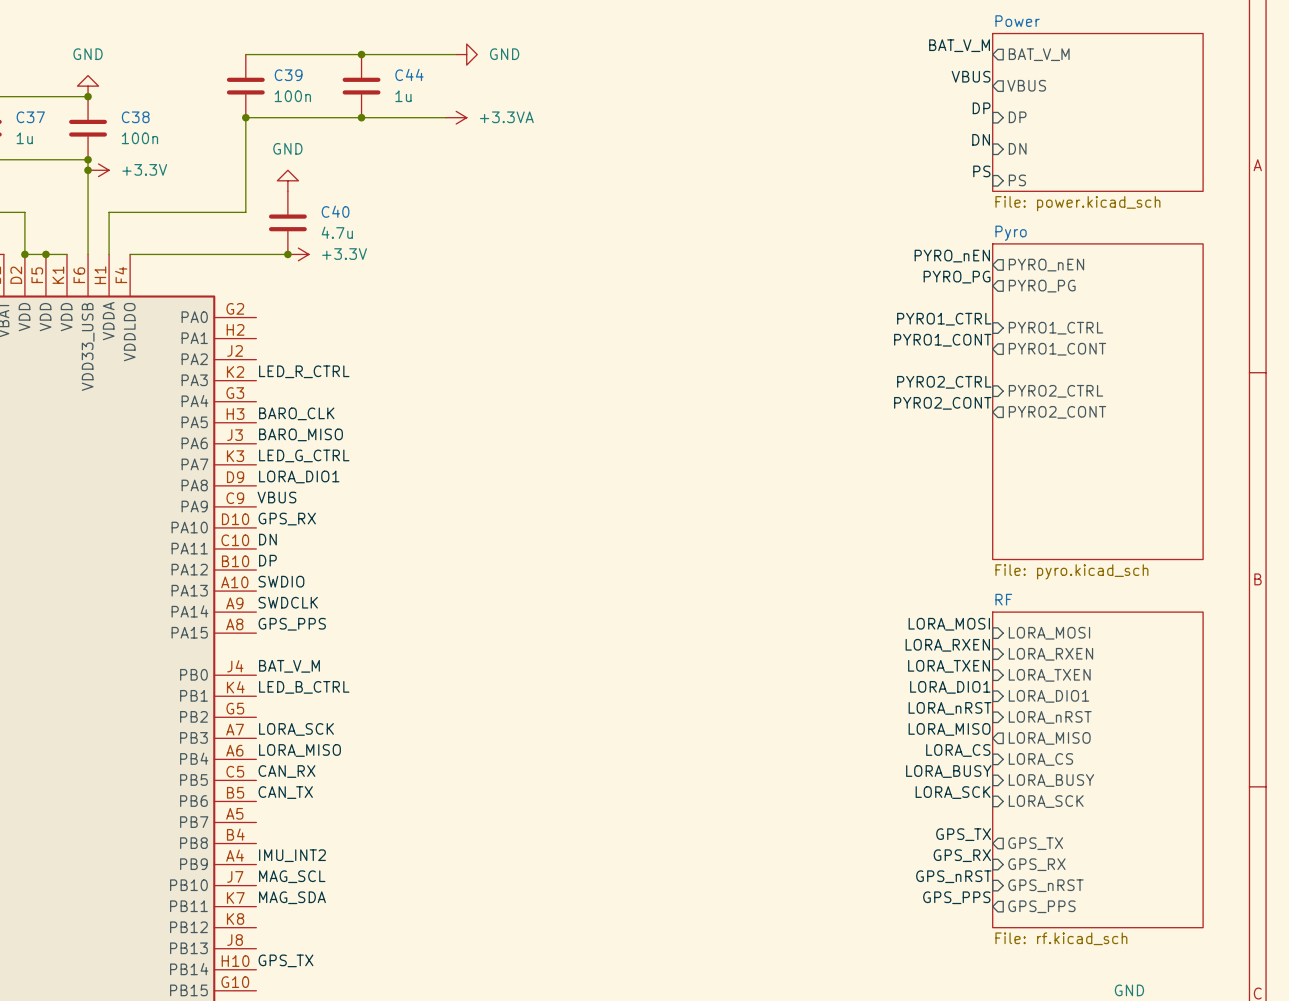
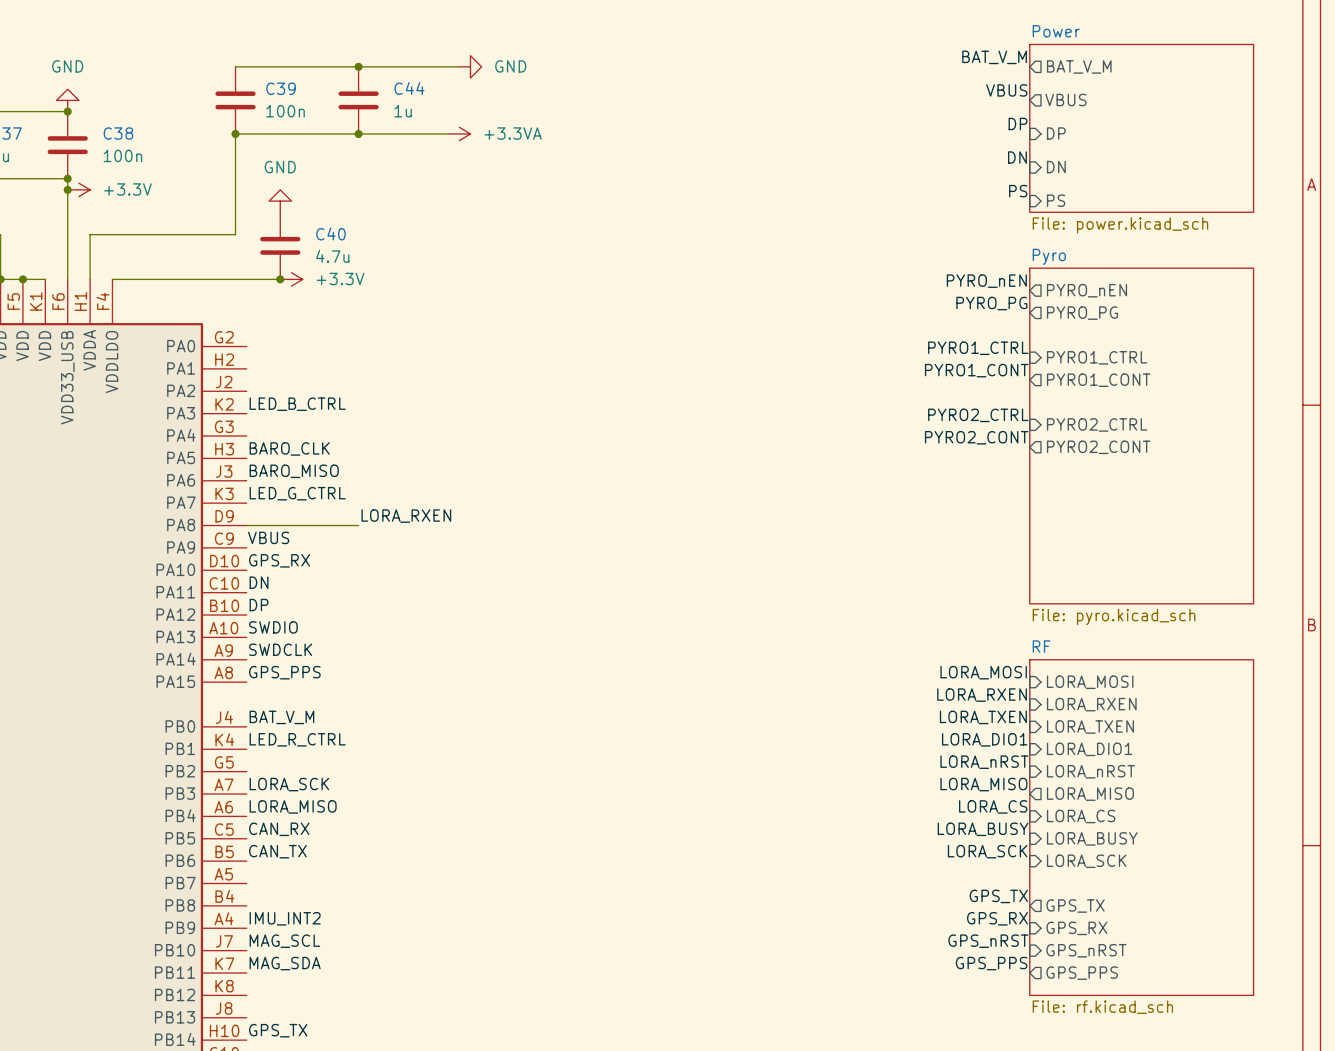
label: LED_R_CTRL (304, 371) -> LED_B_CTRL (297, 404)
label: LORA_DIO1 (299, 476) -> none
label: none -> LORA_RXEN (406, 516)
wire: none -> (246, 525) (358, 525)
label: LED_B_CTRL (304, 687) -> LED_R_CTRL (297, 739)

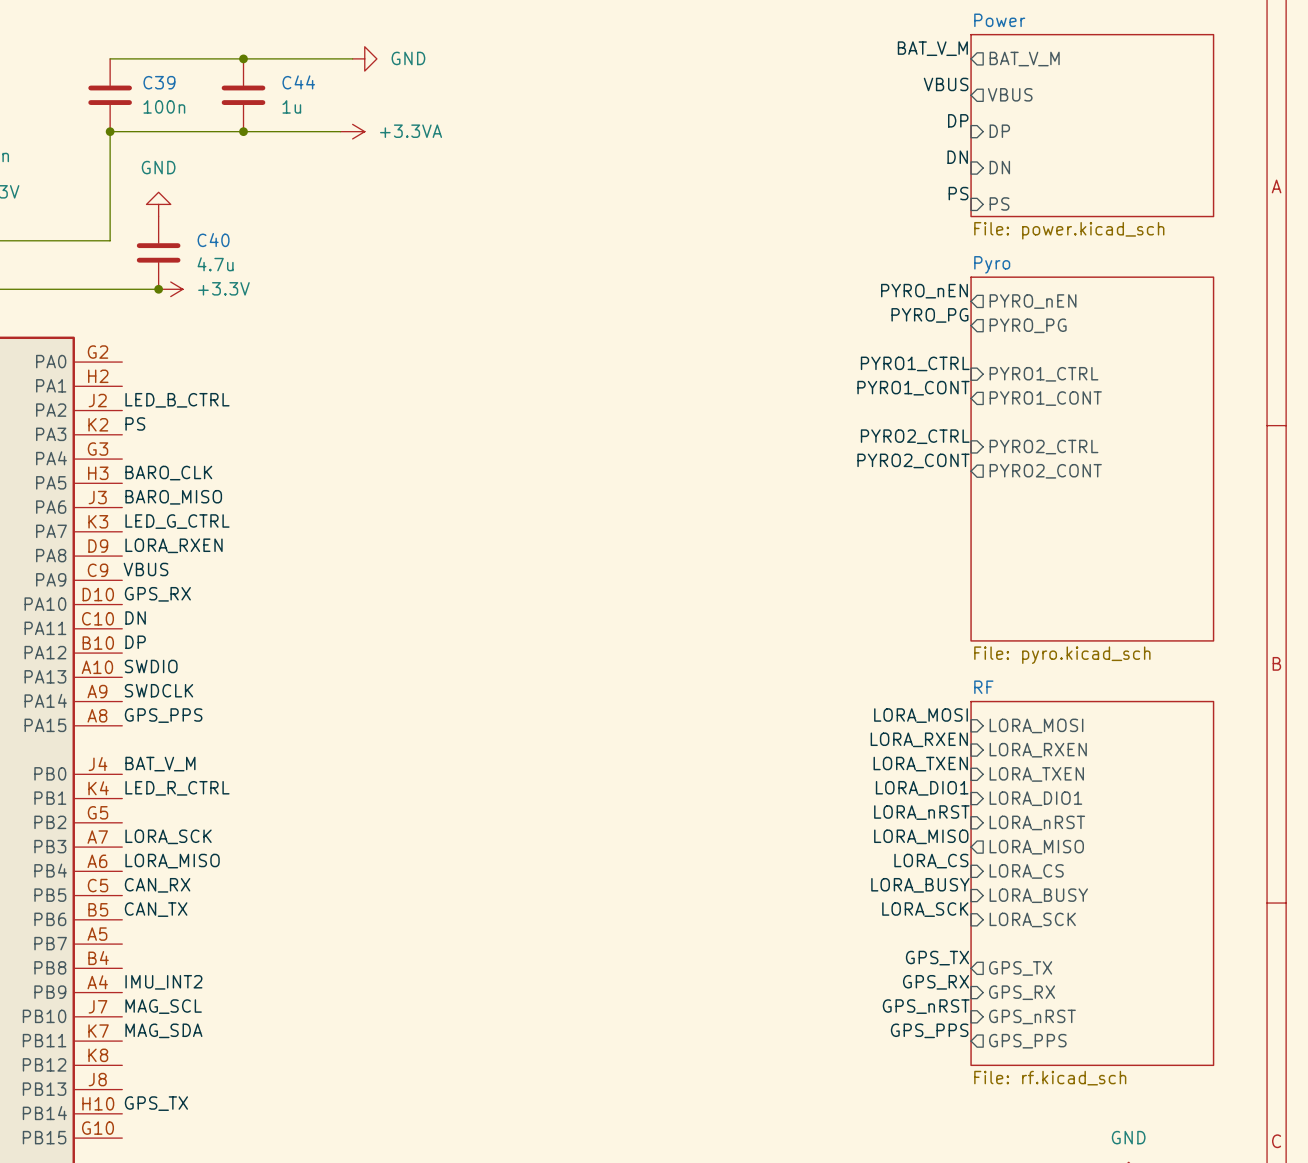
label: none -> LED_B_CTRL (177, 400)
label: LED_B_CTRL (297, 404) -> PS (135, 423)
label position: LORA_RXEN (406, 516) -> LORA_RXEN (174, 545)
wire: (246, 525) (358, 525) -> none

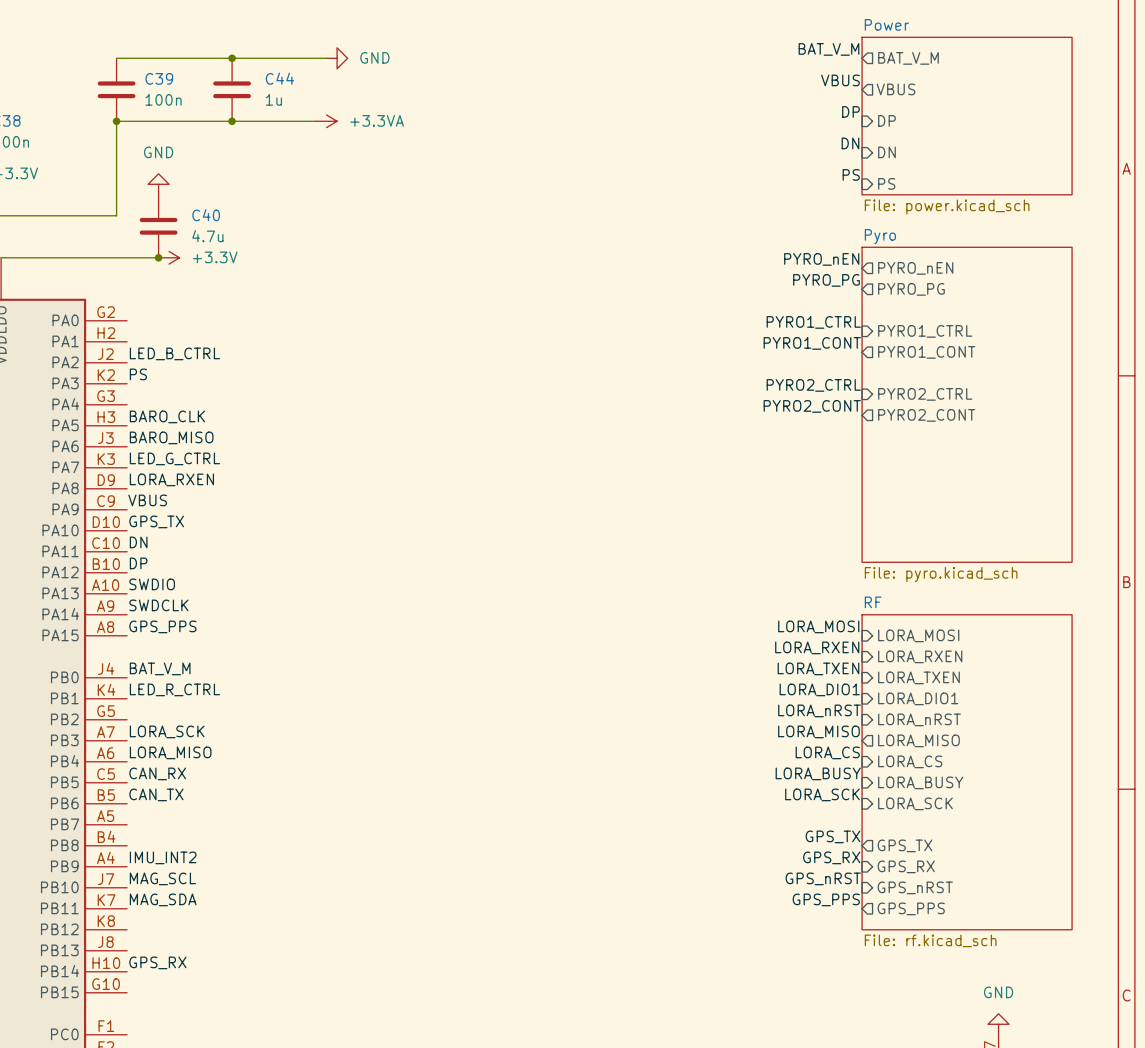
label: GPS_RX (157, 594) -> GPS_TX (156, 521)
label: GPS_TX (156, 1103) -> GPS_RX (157, 962)

